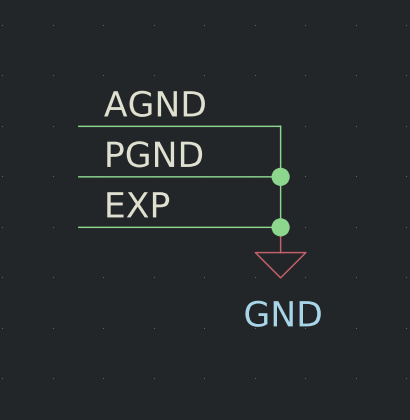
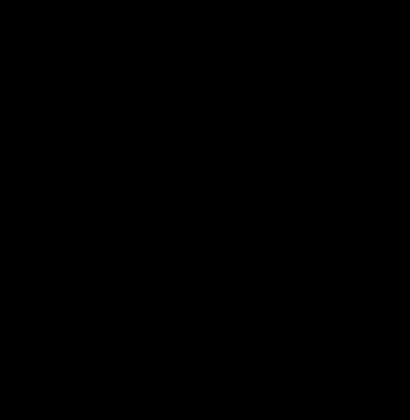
label: AGND (154, 103) -> none
wire: (78, 126) (280, 126) (280, 227) (78, 227) -> none
label: PGND (154, 154) -> none
wire: (78, 176) (280, 176) -> none
junction: (280, 176) -> none
label: EXP (138, 204) -> none
junction: (280, 227) -> none
power symbol: GND (280, 252) -> none

